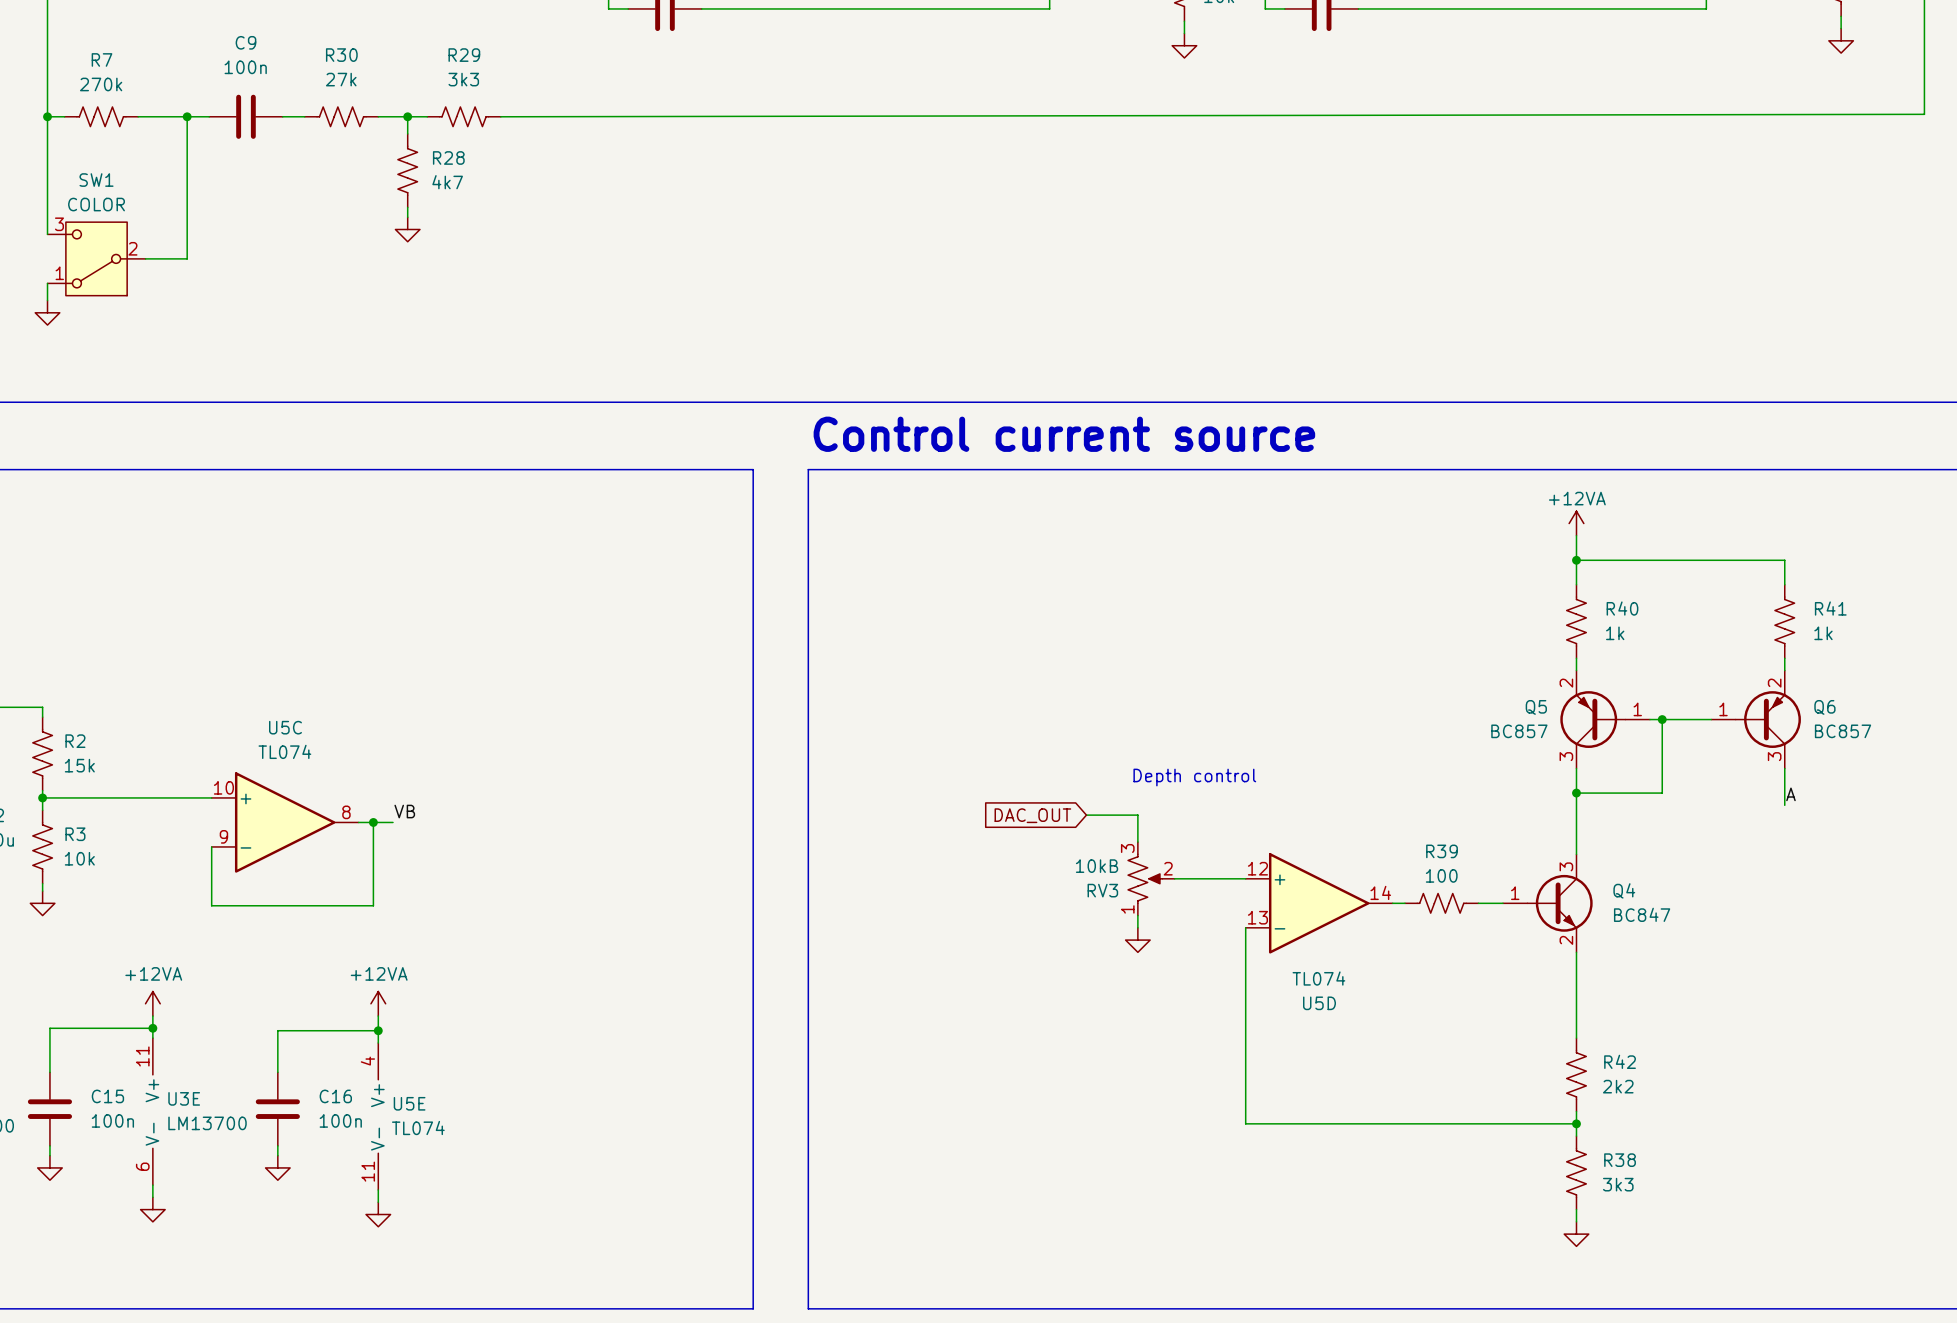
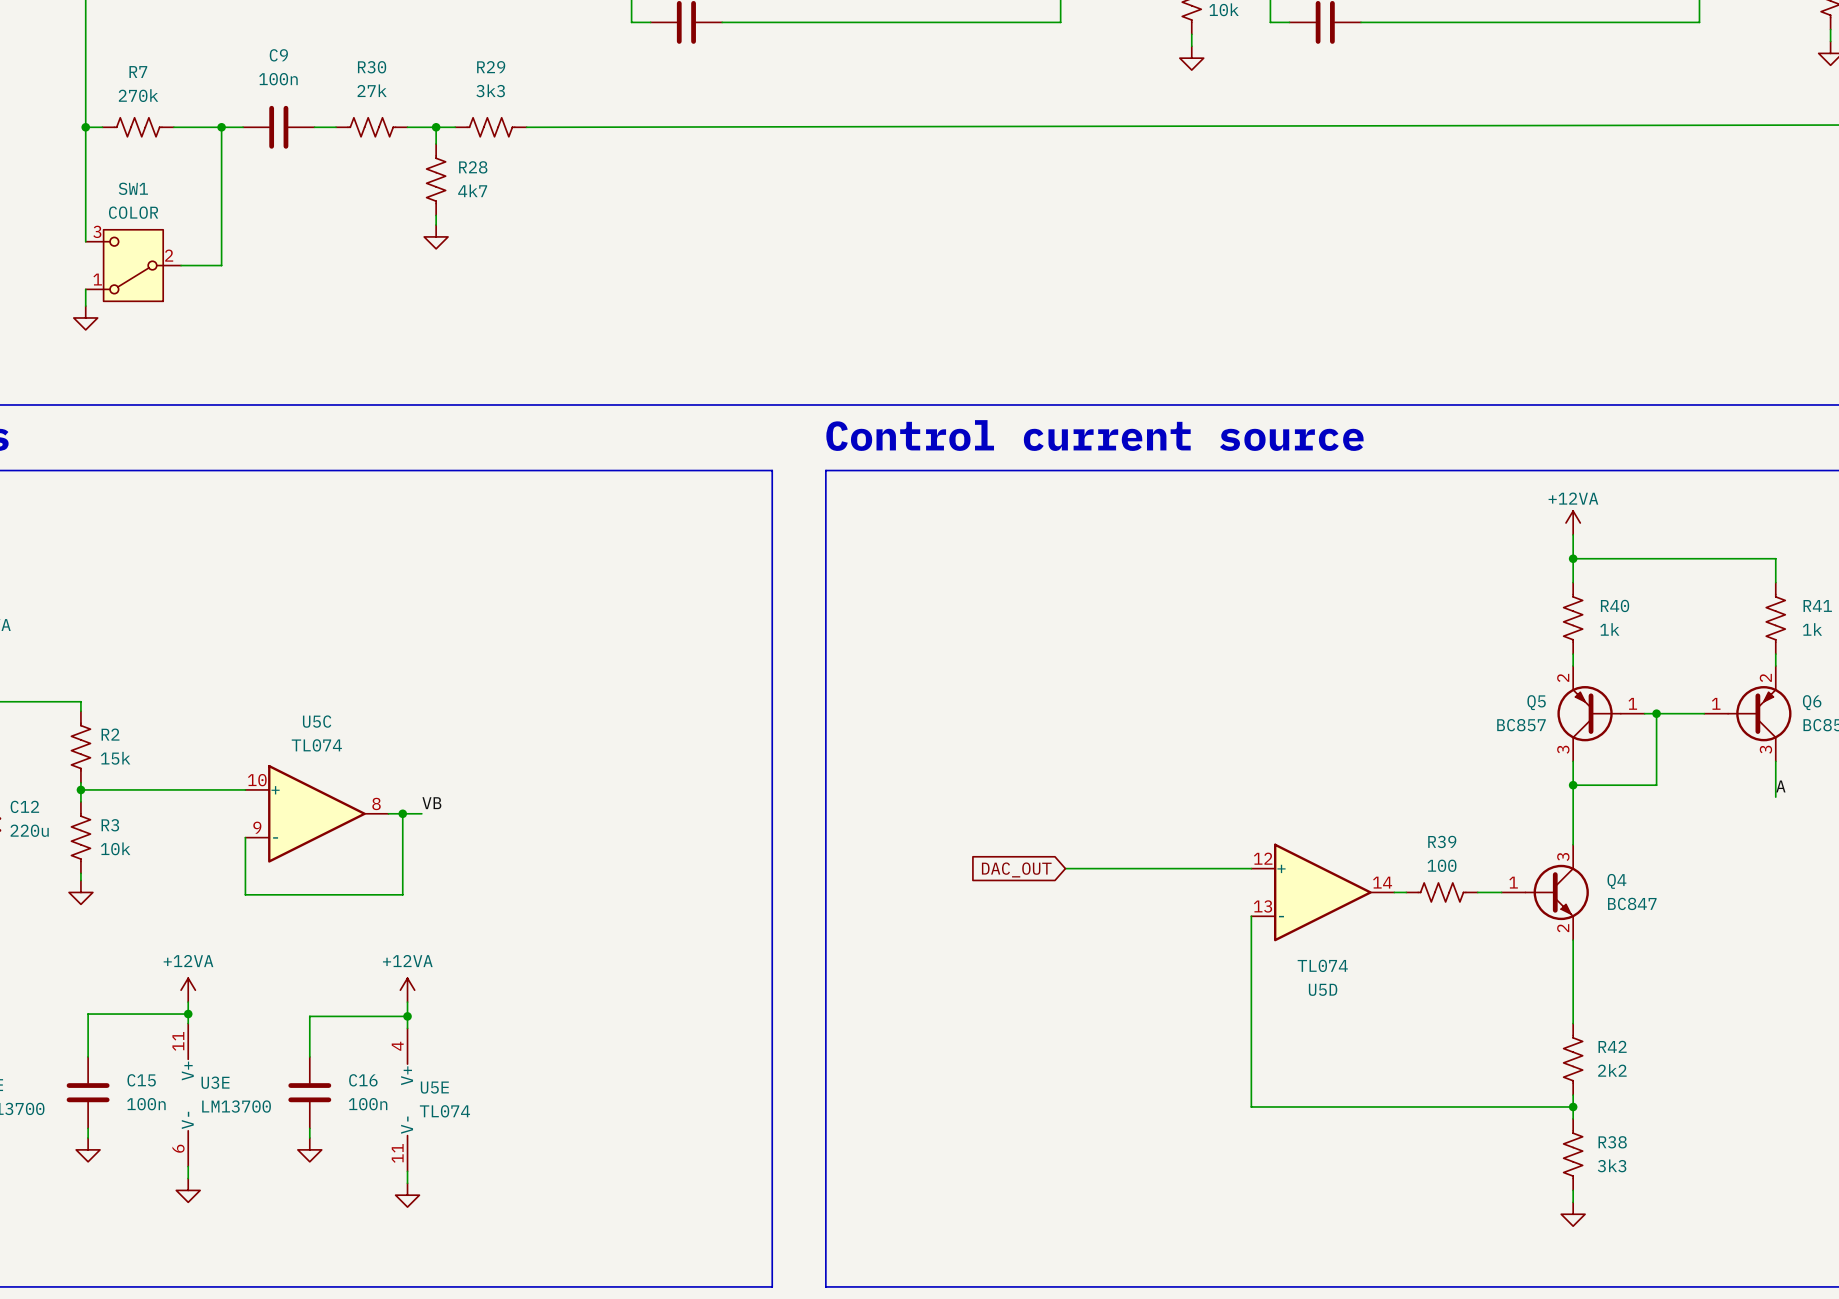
text: Depth control (1194, 777) -> none
global label position: DAC_OUT (1032, 815) -> DAC_OUT (1016, 869)
wire: (1086, 815) (1137, 815) (1137, 842) -> none
wire: none -> (1065, 868) (1182, 868)
RV3: 10kB (1151, 878) -> none
wire: (1137, 915) (1137, 927) -> none
power symbol: (1137, 940) -> none

